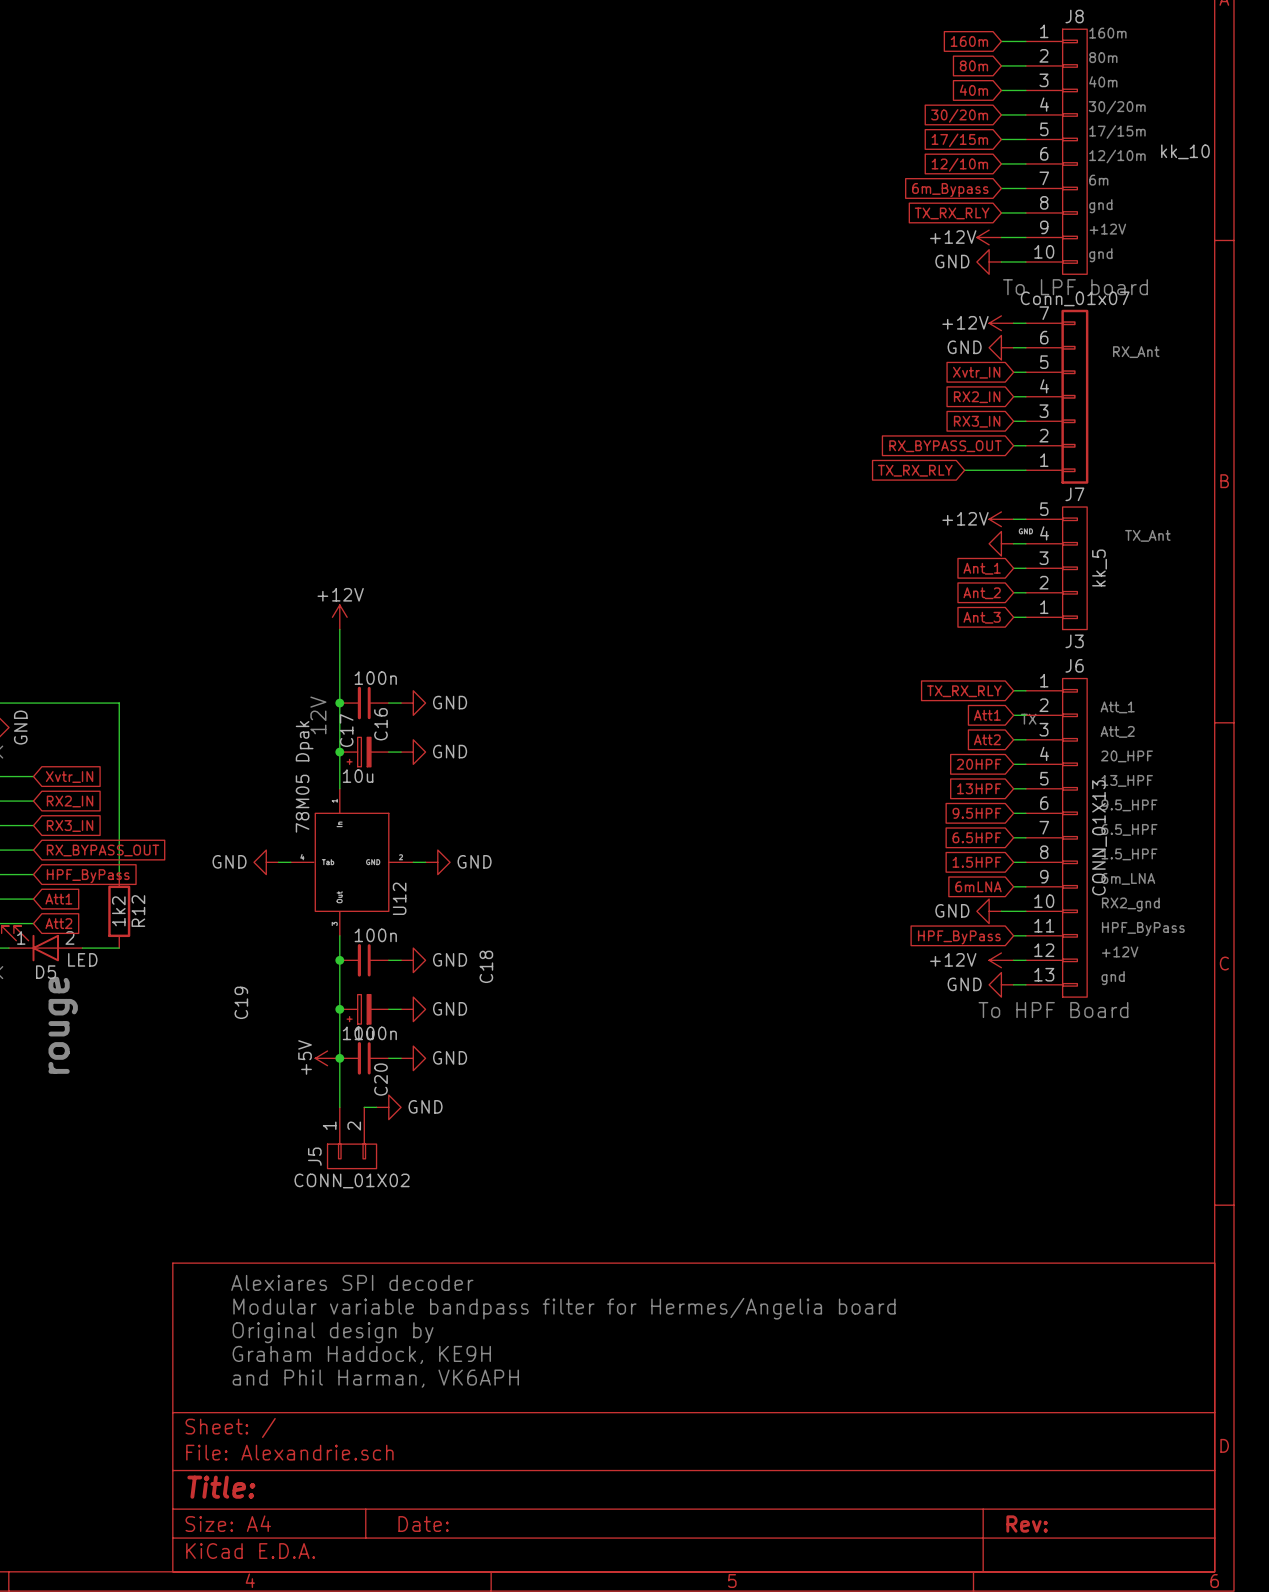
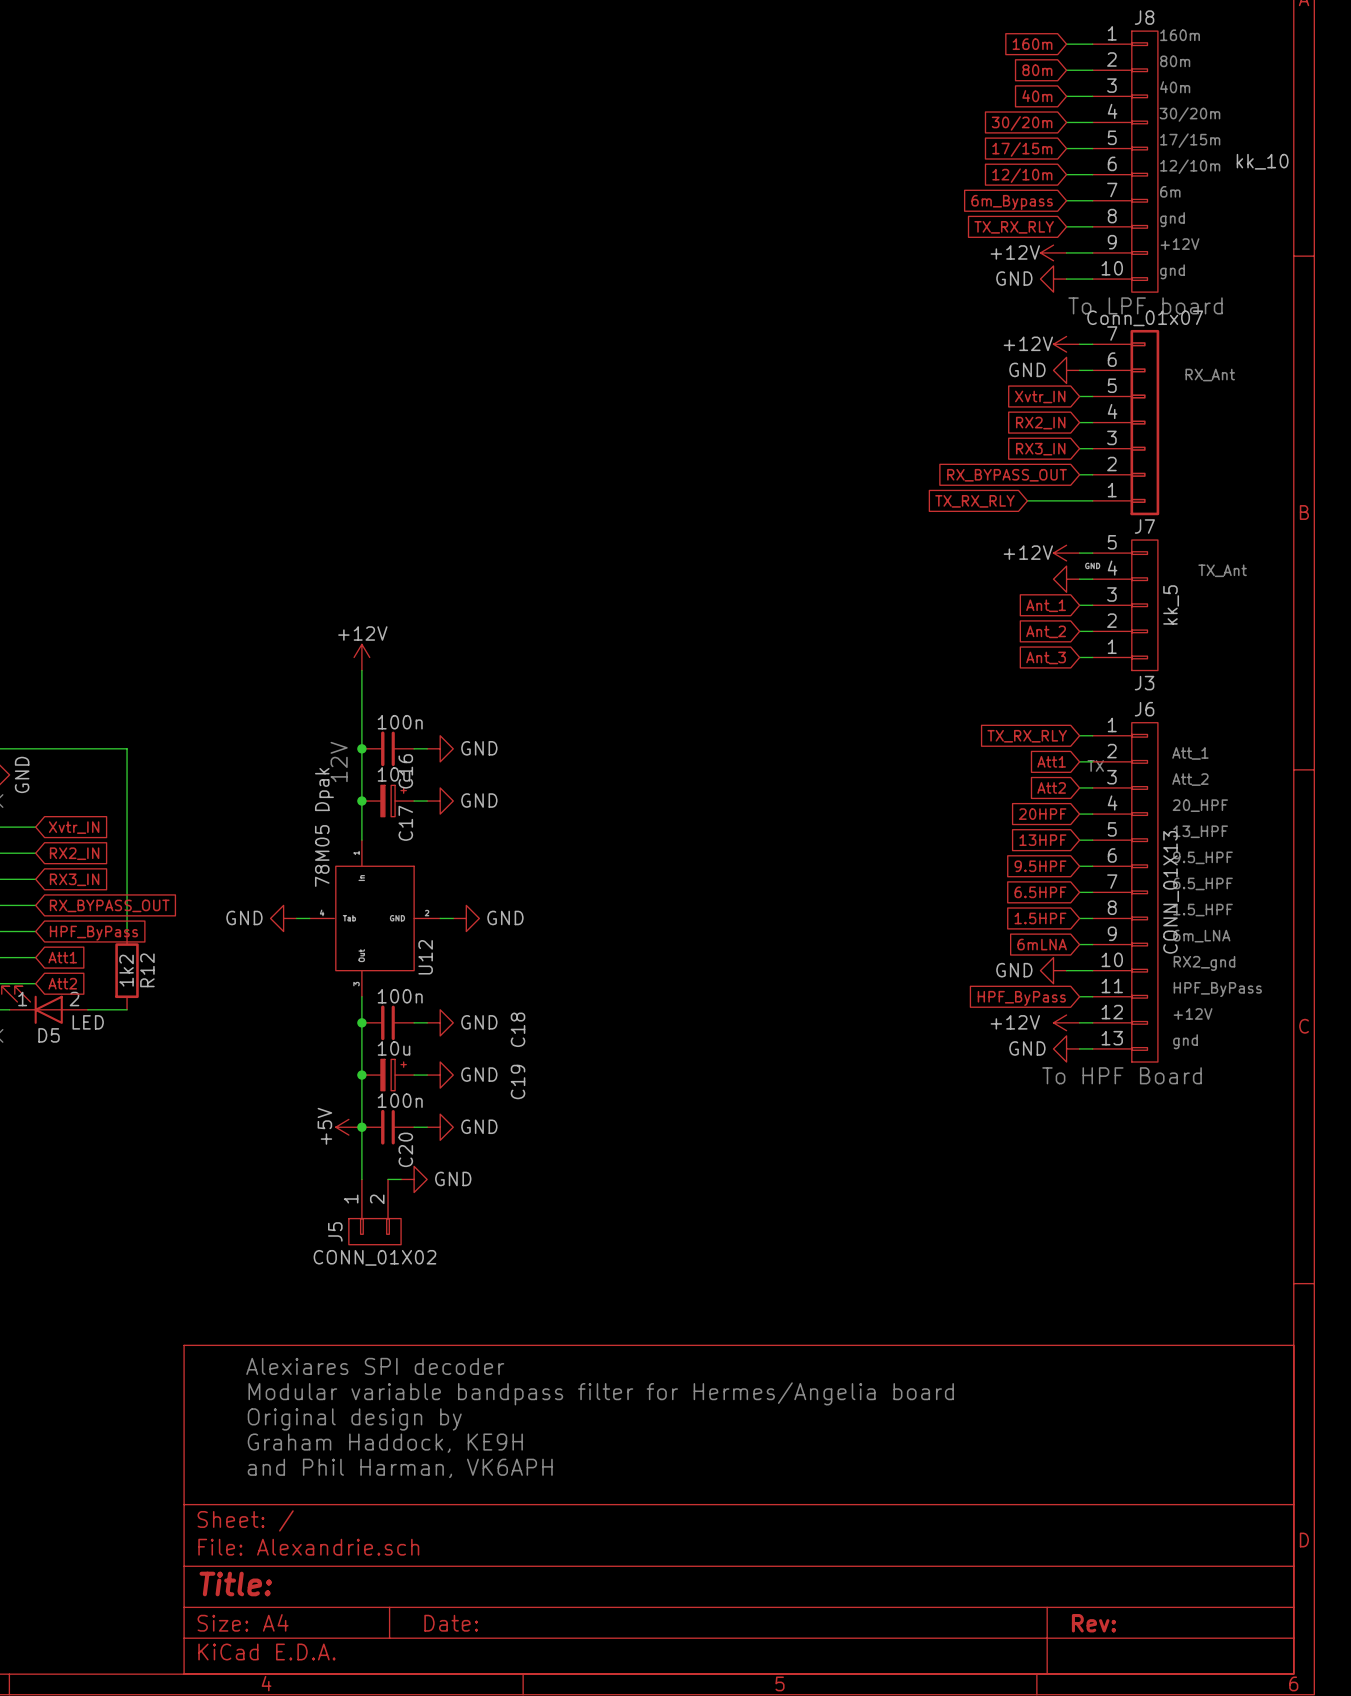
C17 rotation: 0° (359, 752) -> 180° (393, 801)
C19 rotation: 0° (359, 1009) -> 180° (393, 1075)
text: rouge (63, 1025) -> none

